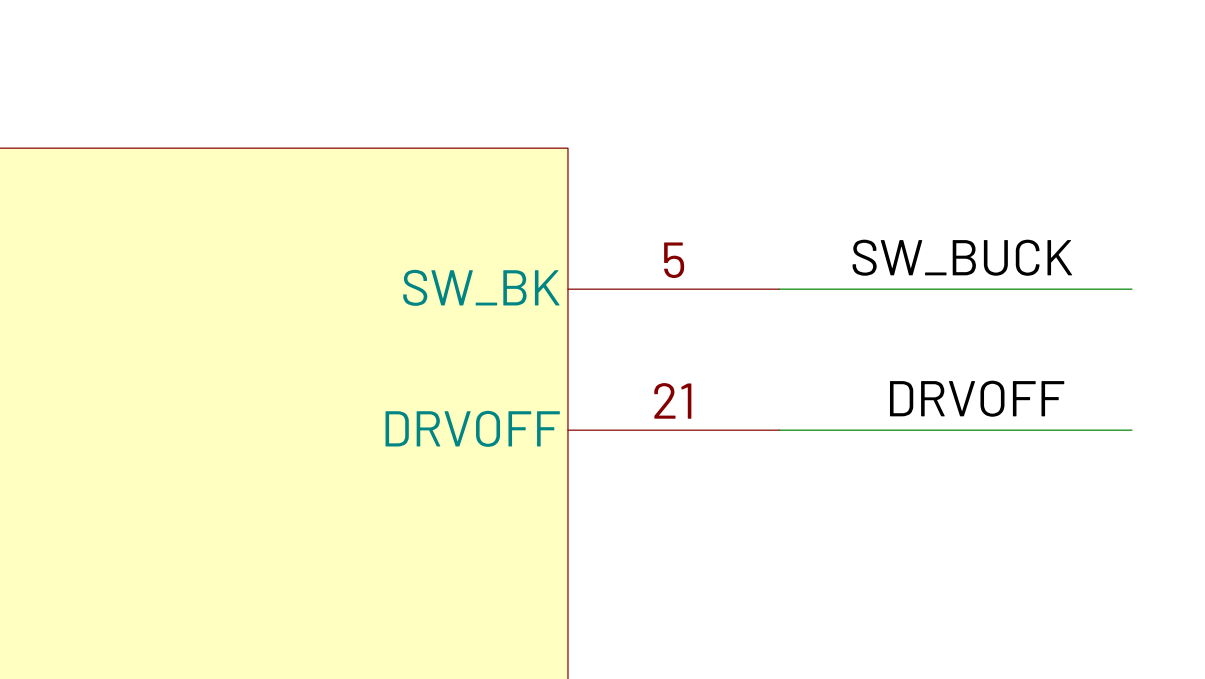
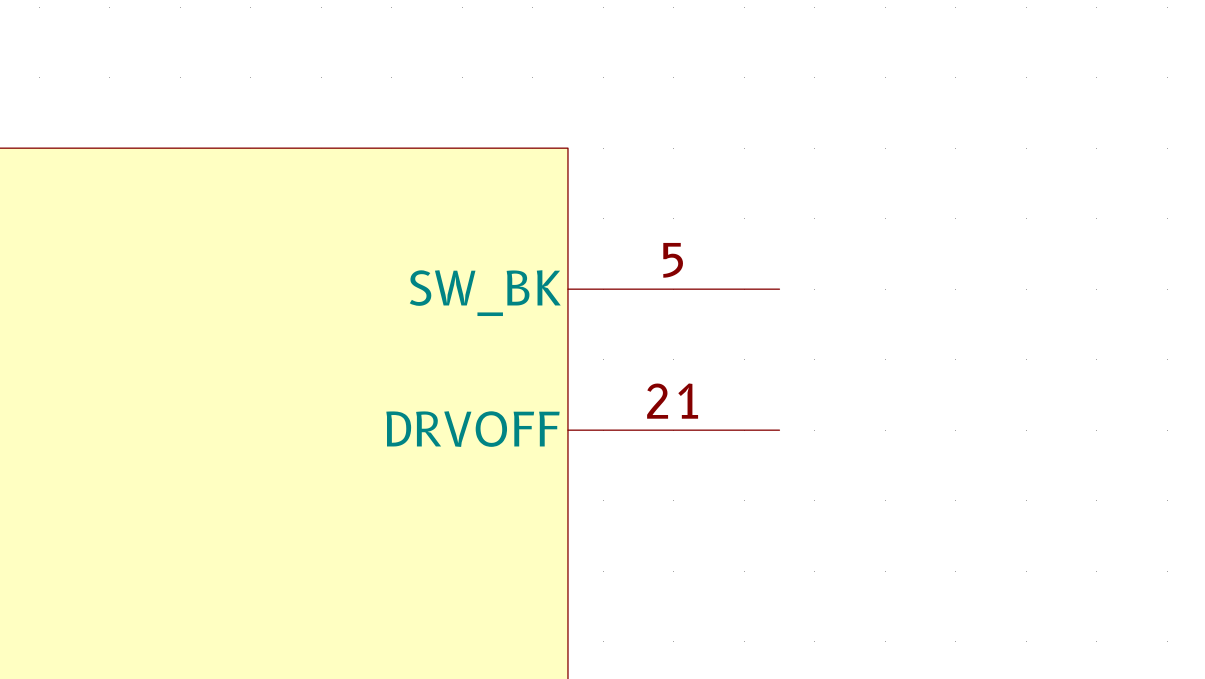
label: SW_BUCK (962, 257) -> none
wire: (779, 289) (1131, 289) -> none
label: DRVOFF (977, 398) -> none
wire: (779, 430) (1131, 430) -> none

